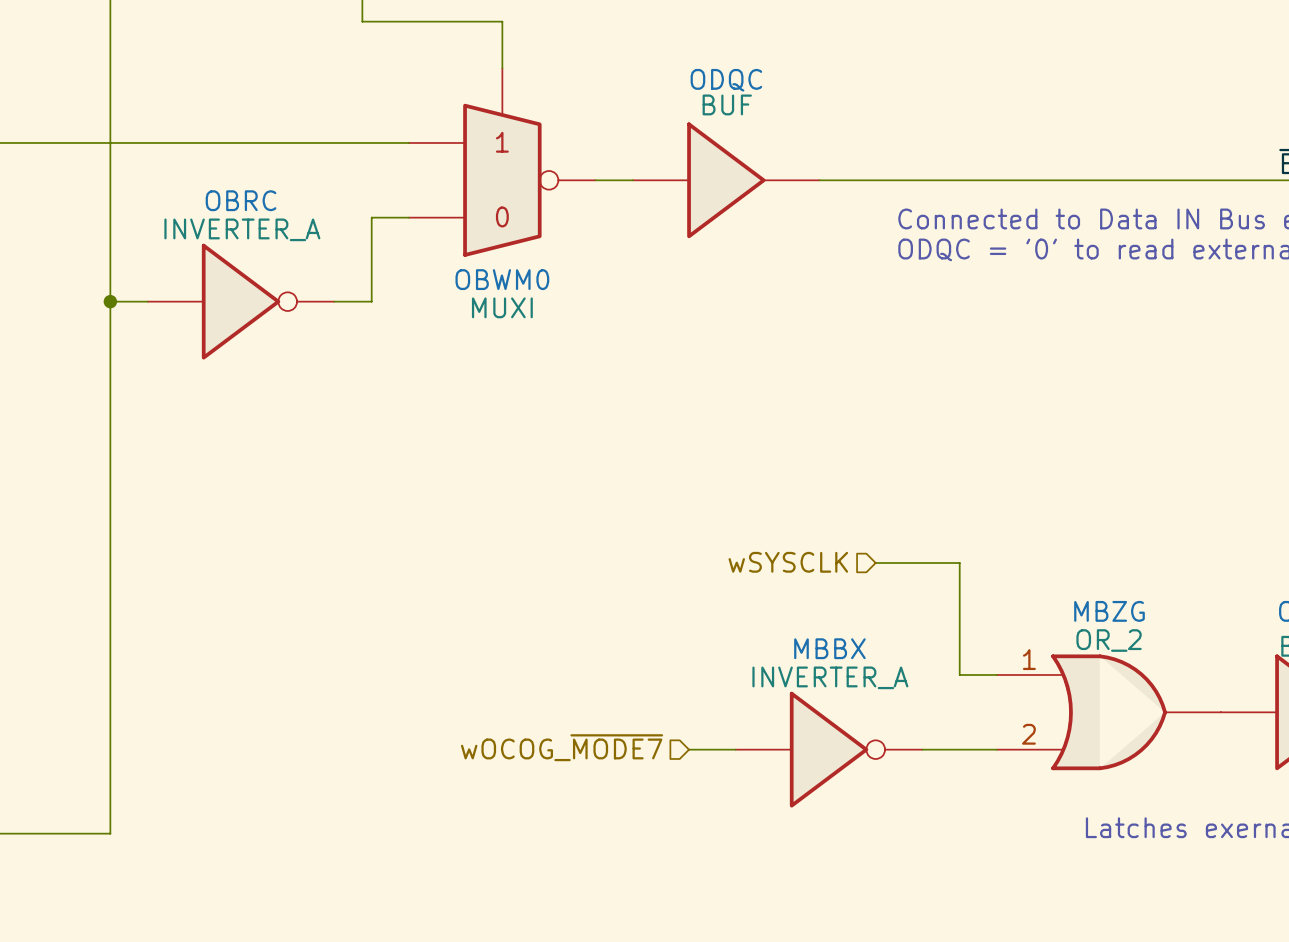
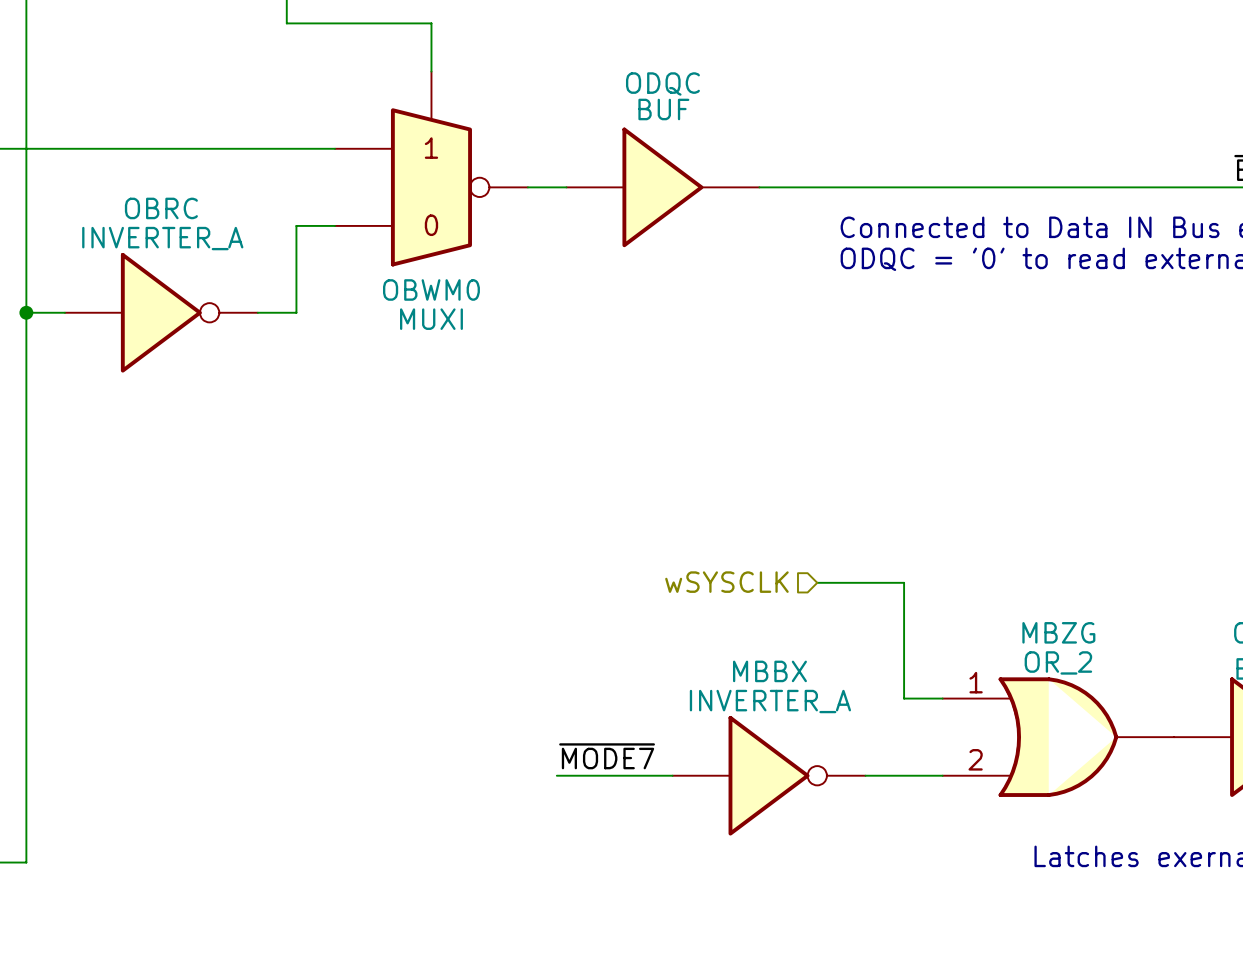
label: none -> ~{MODE7} (607, 756)
hierarchical label: wOCOG_~{MODE7} (562, 747) -> none
wire: none -> (556, 775) (624, 775)

